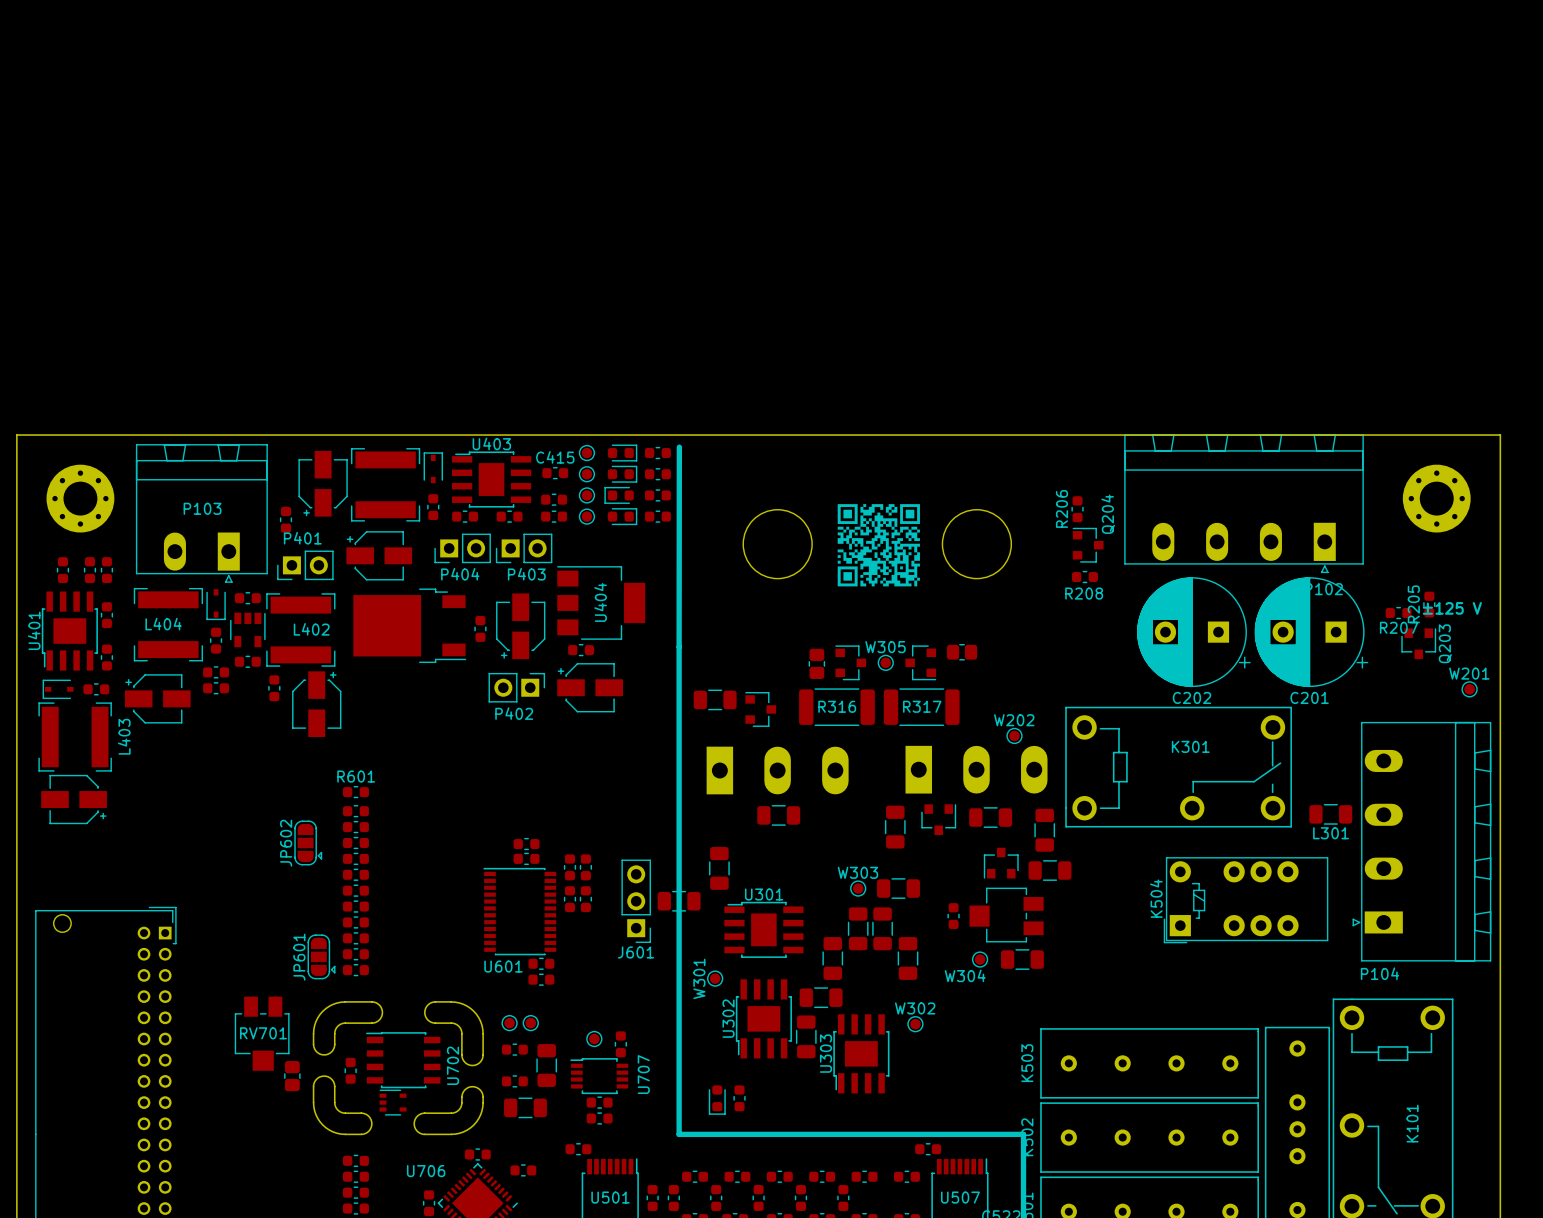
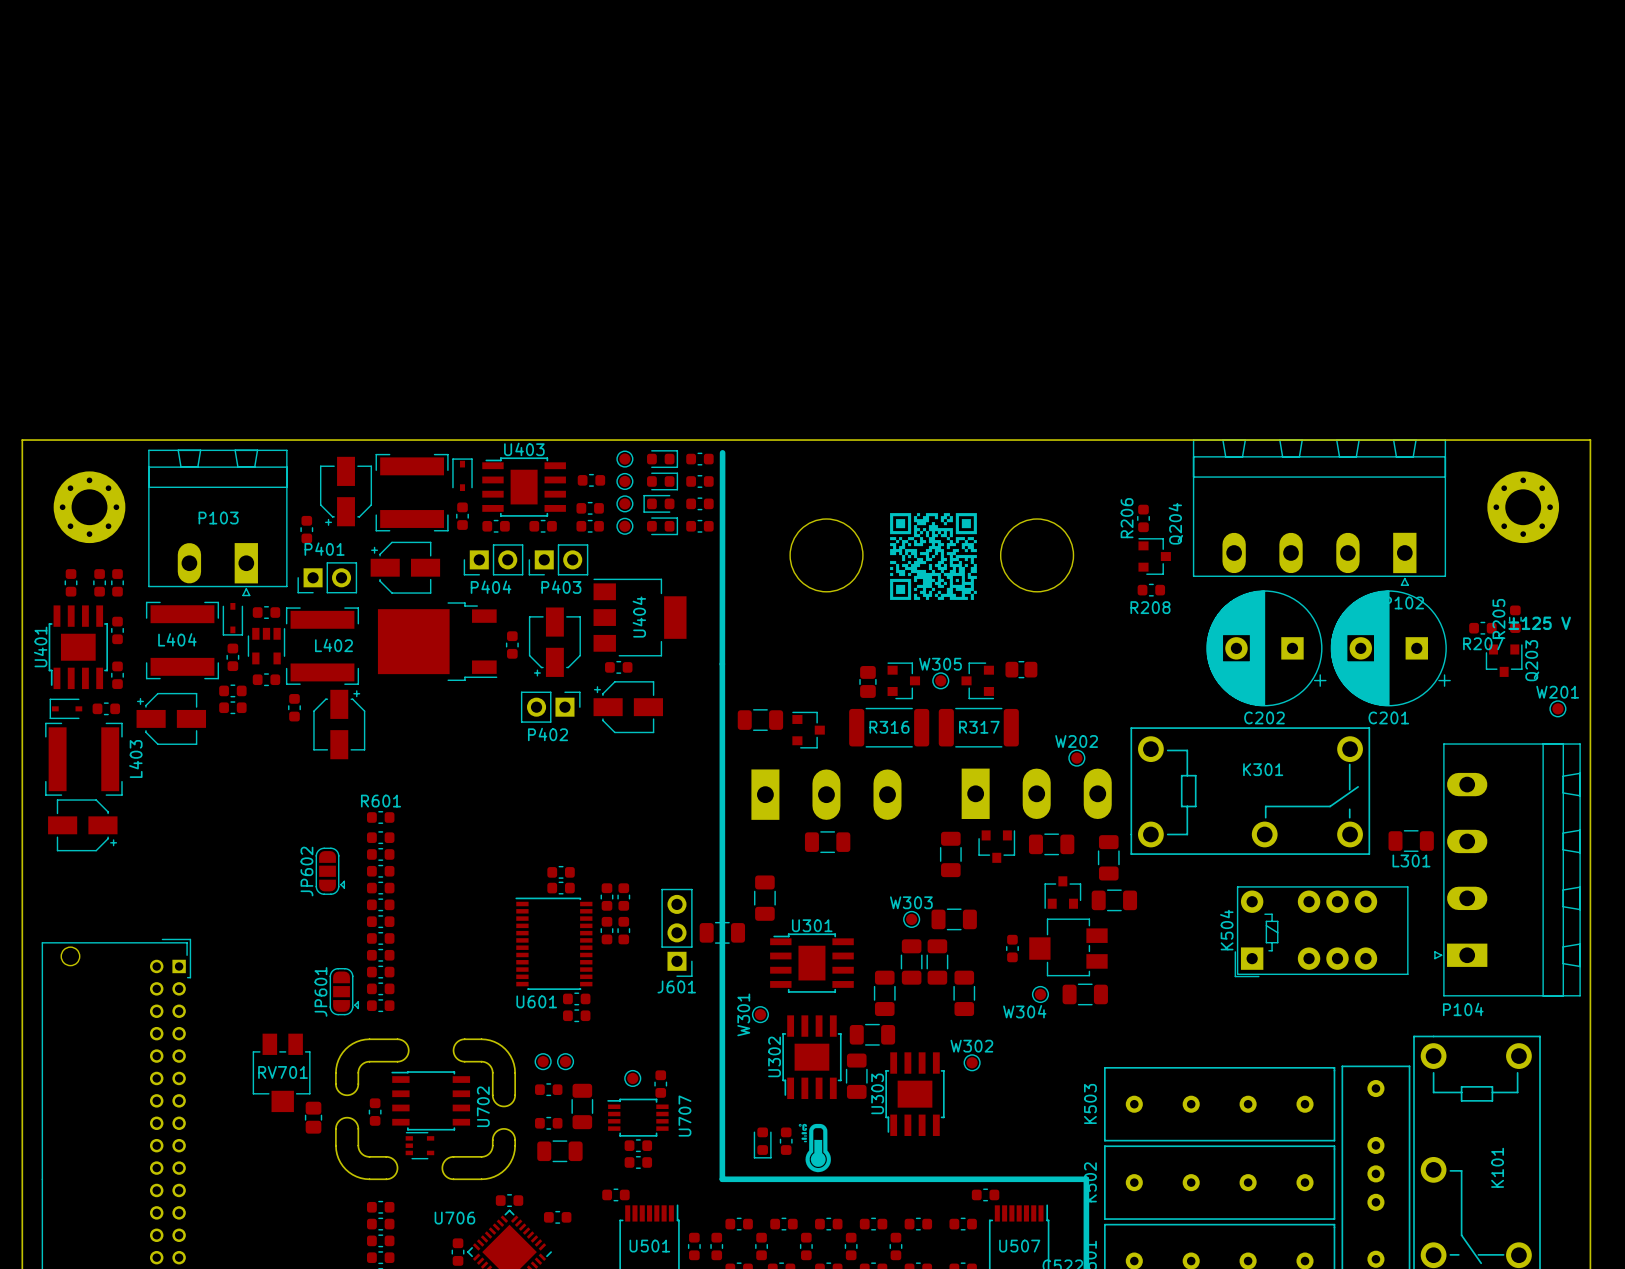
C415 name: C415 (555, 457) -> none
drawing: none -> [798, 1123, 831, 1173]

